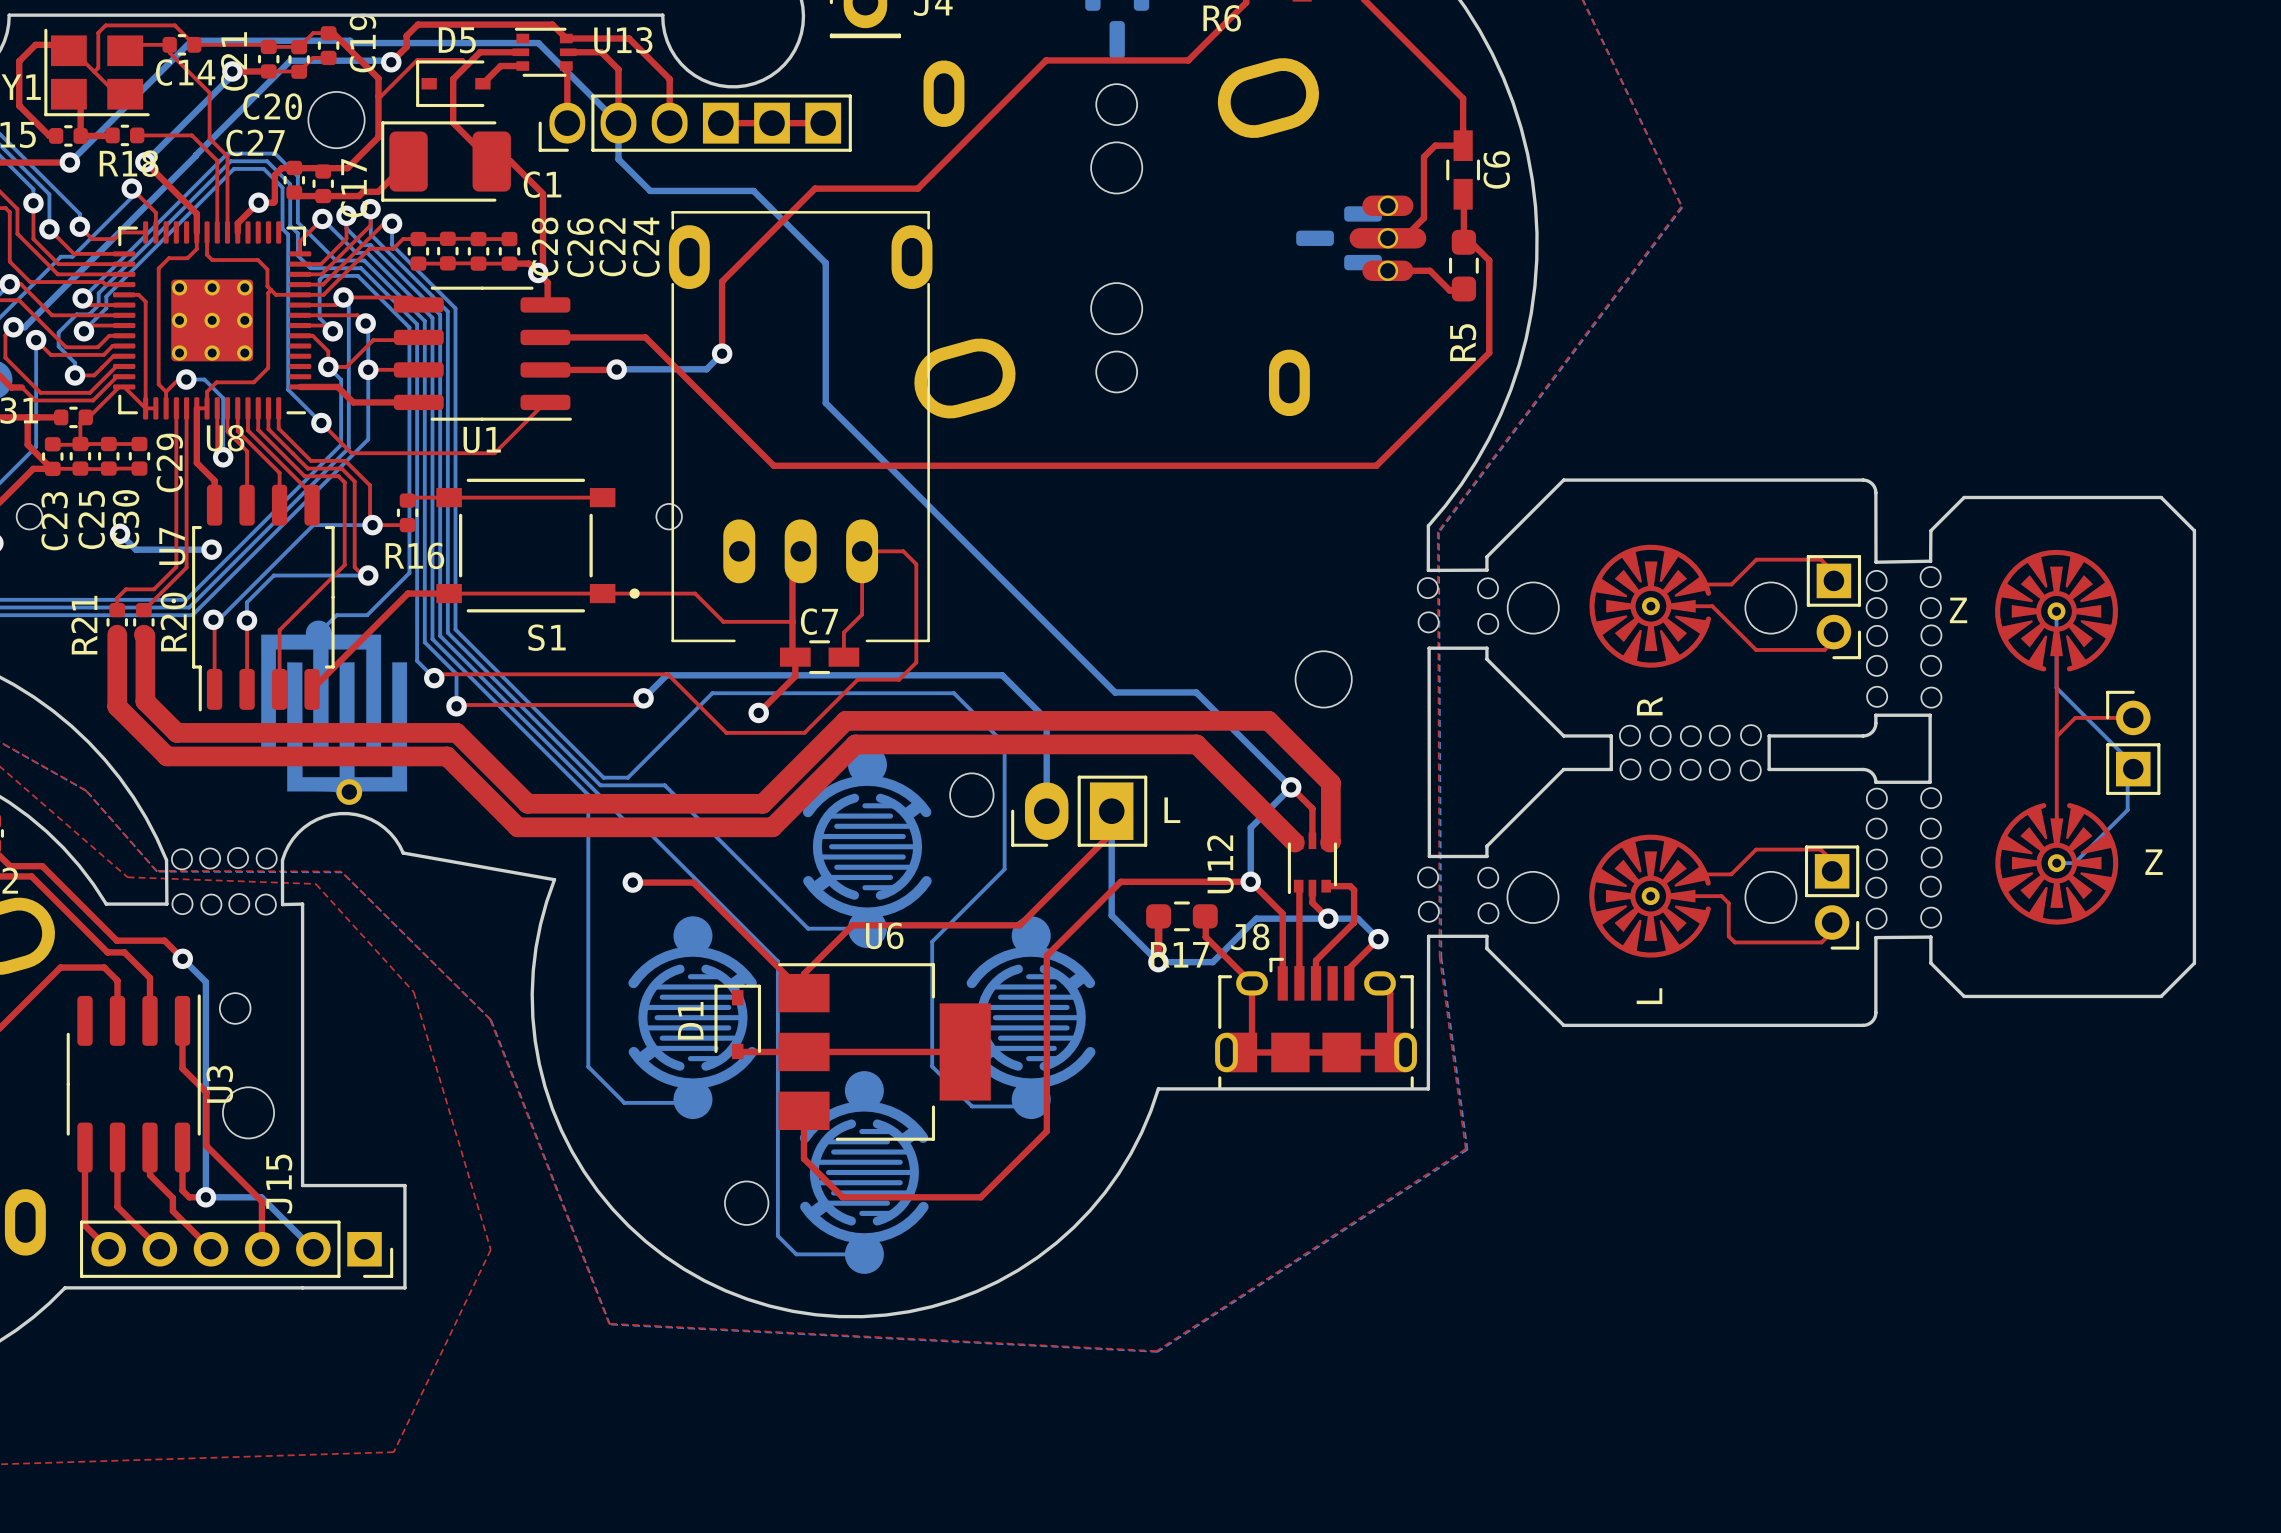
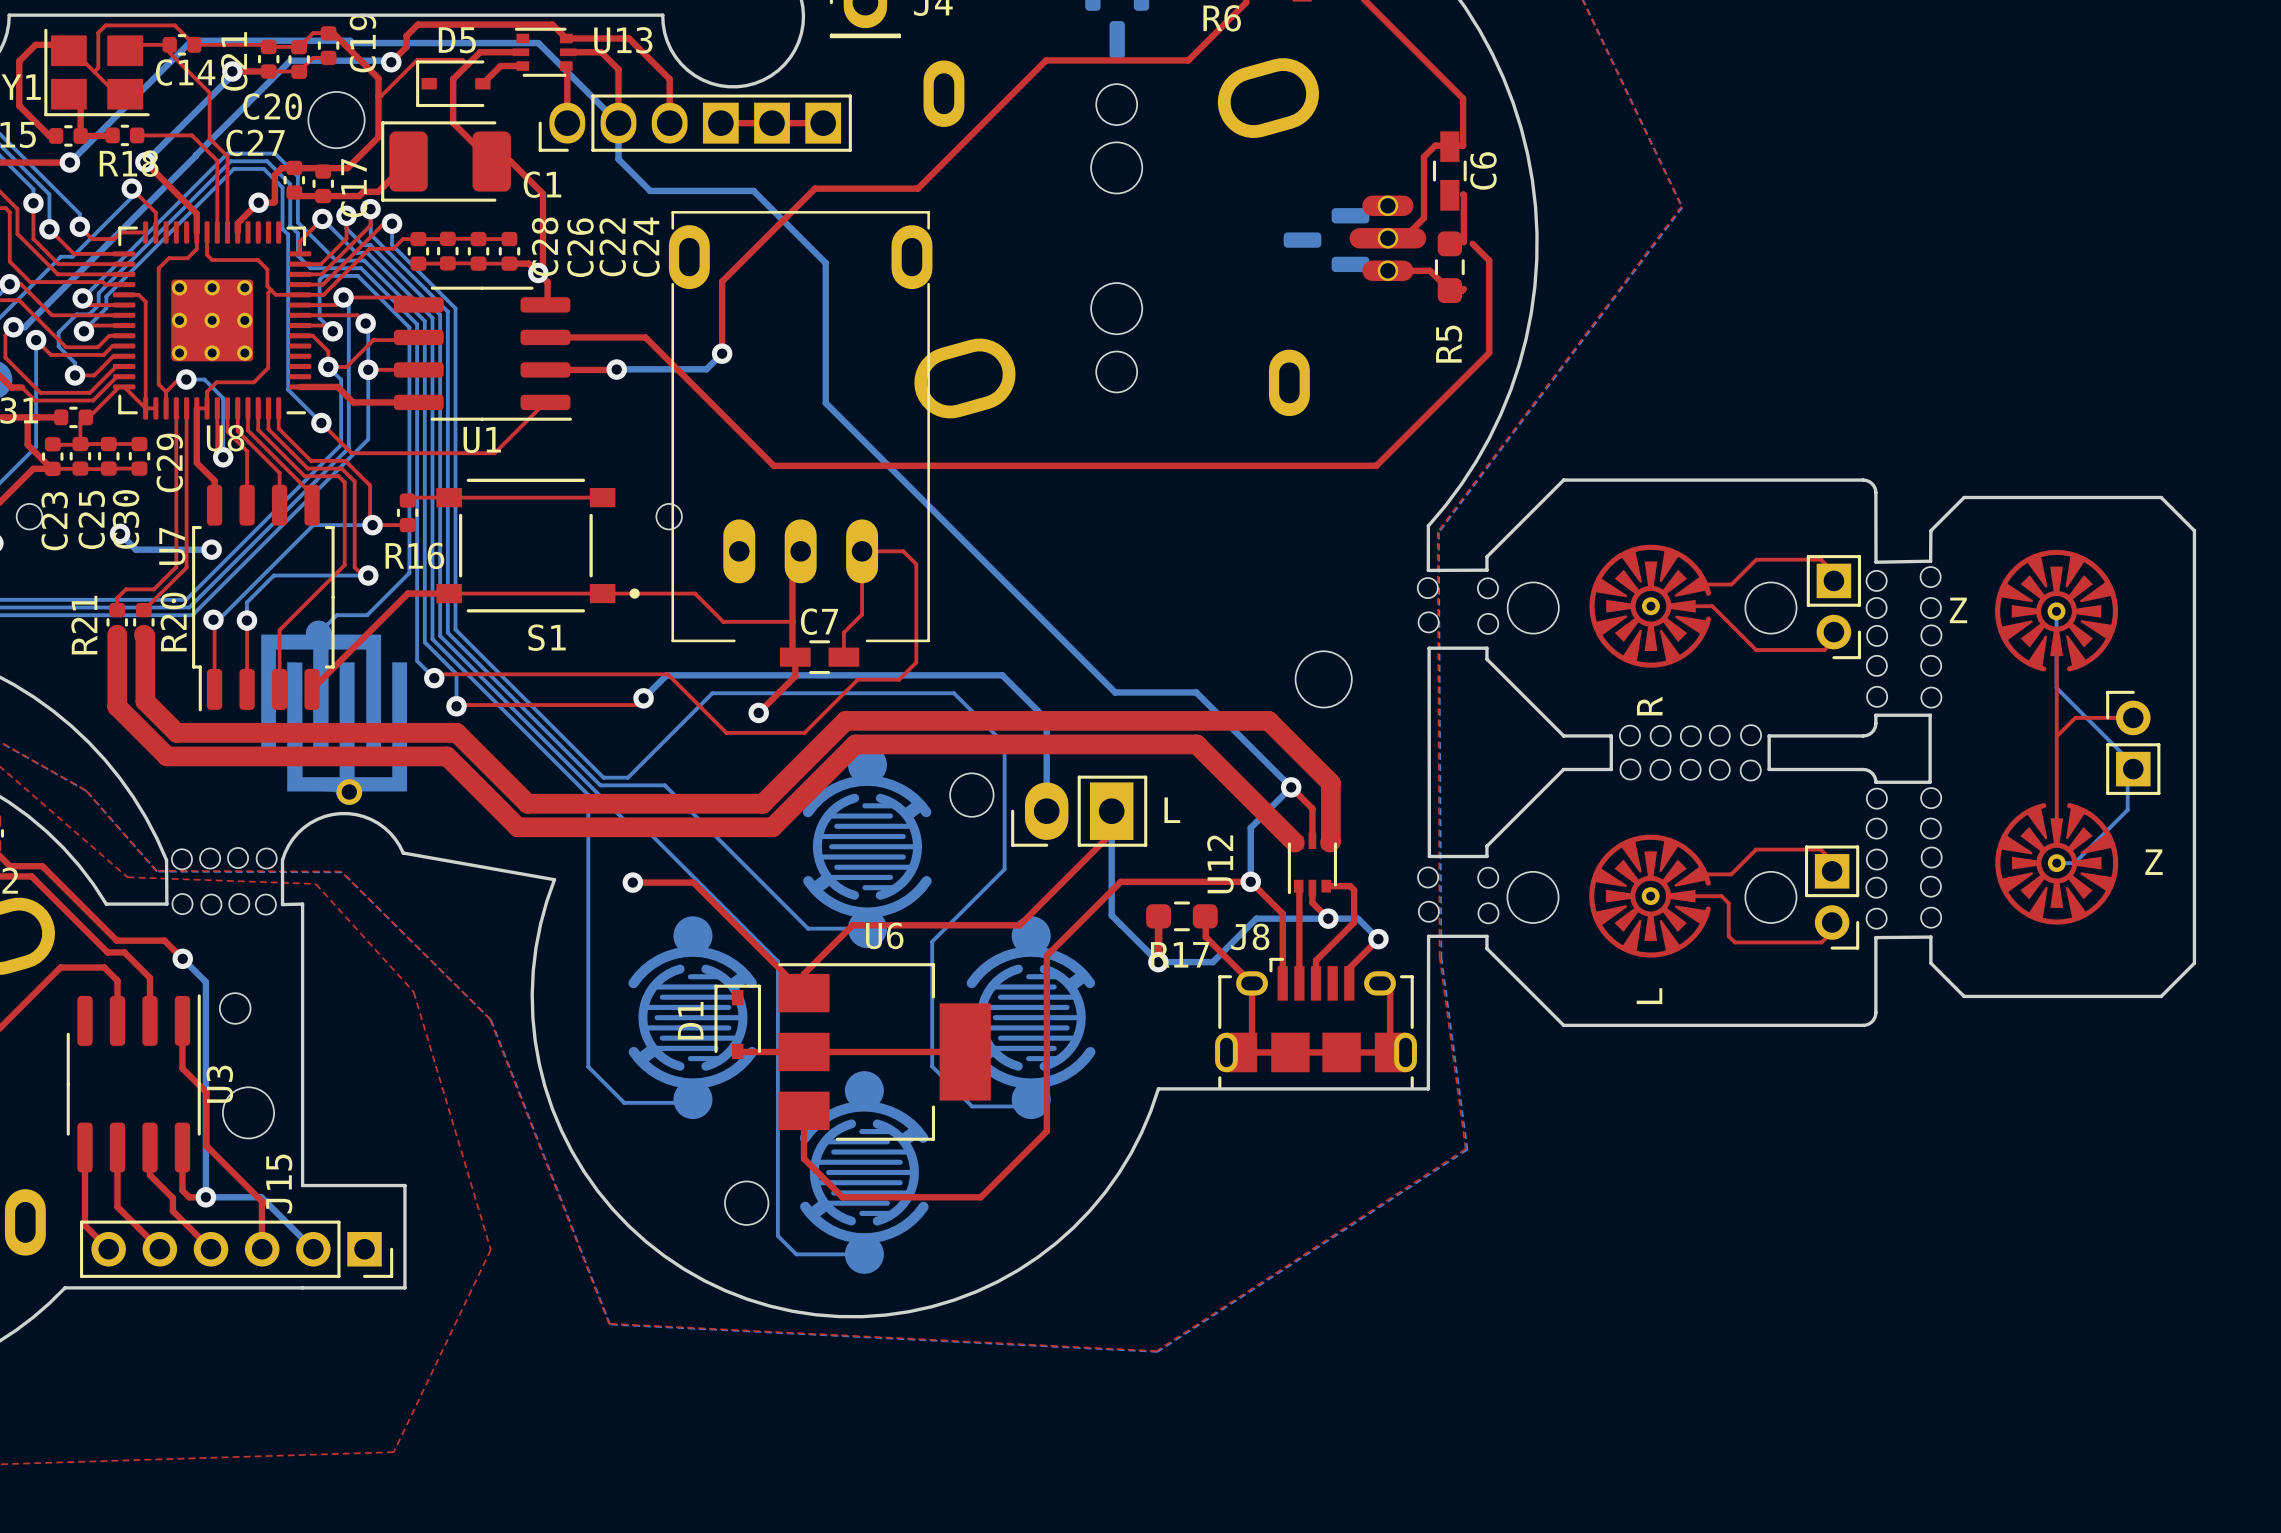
C6 position: (1463, 169) -> (1449, 170)
part position: (1339, 238) -> (1326, 240)
R5 position: (1463, 265) -> (1449, 267)

